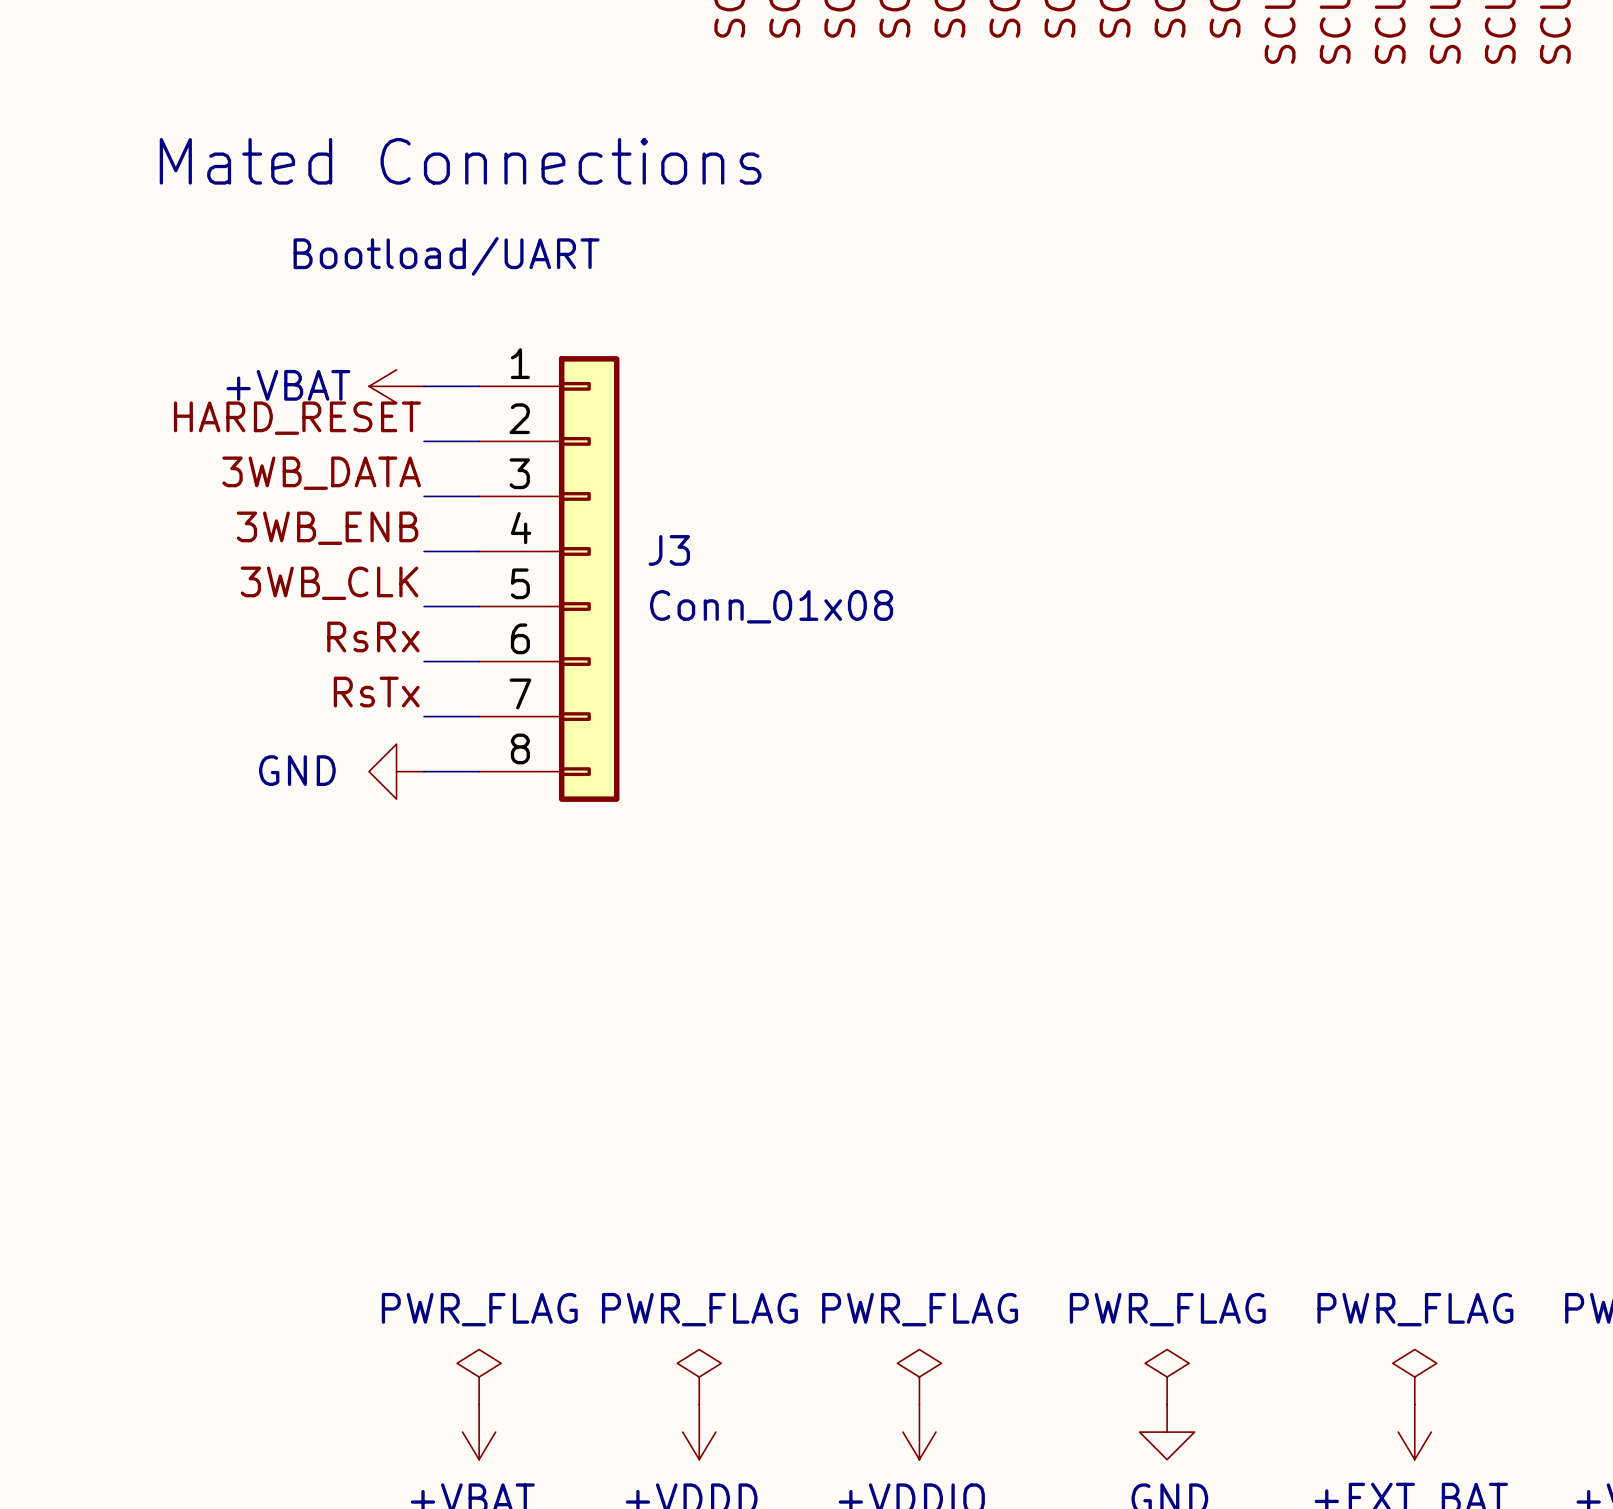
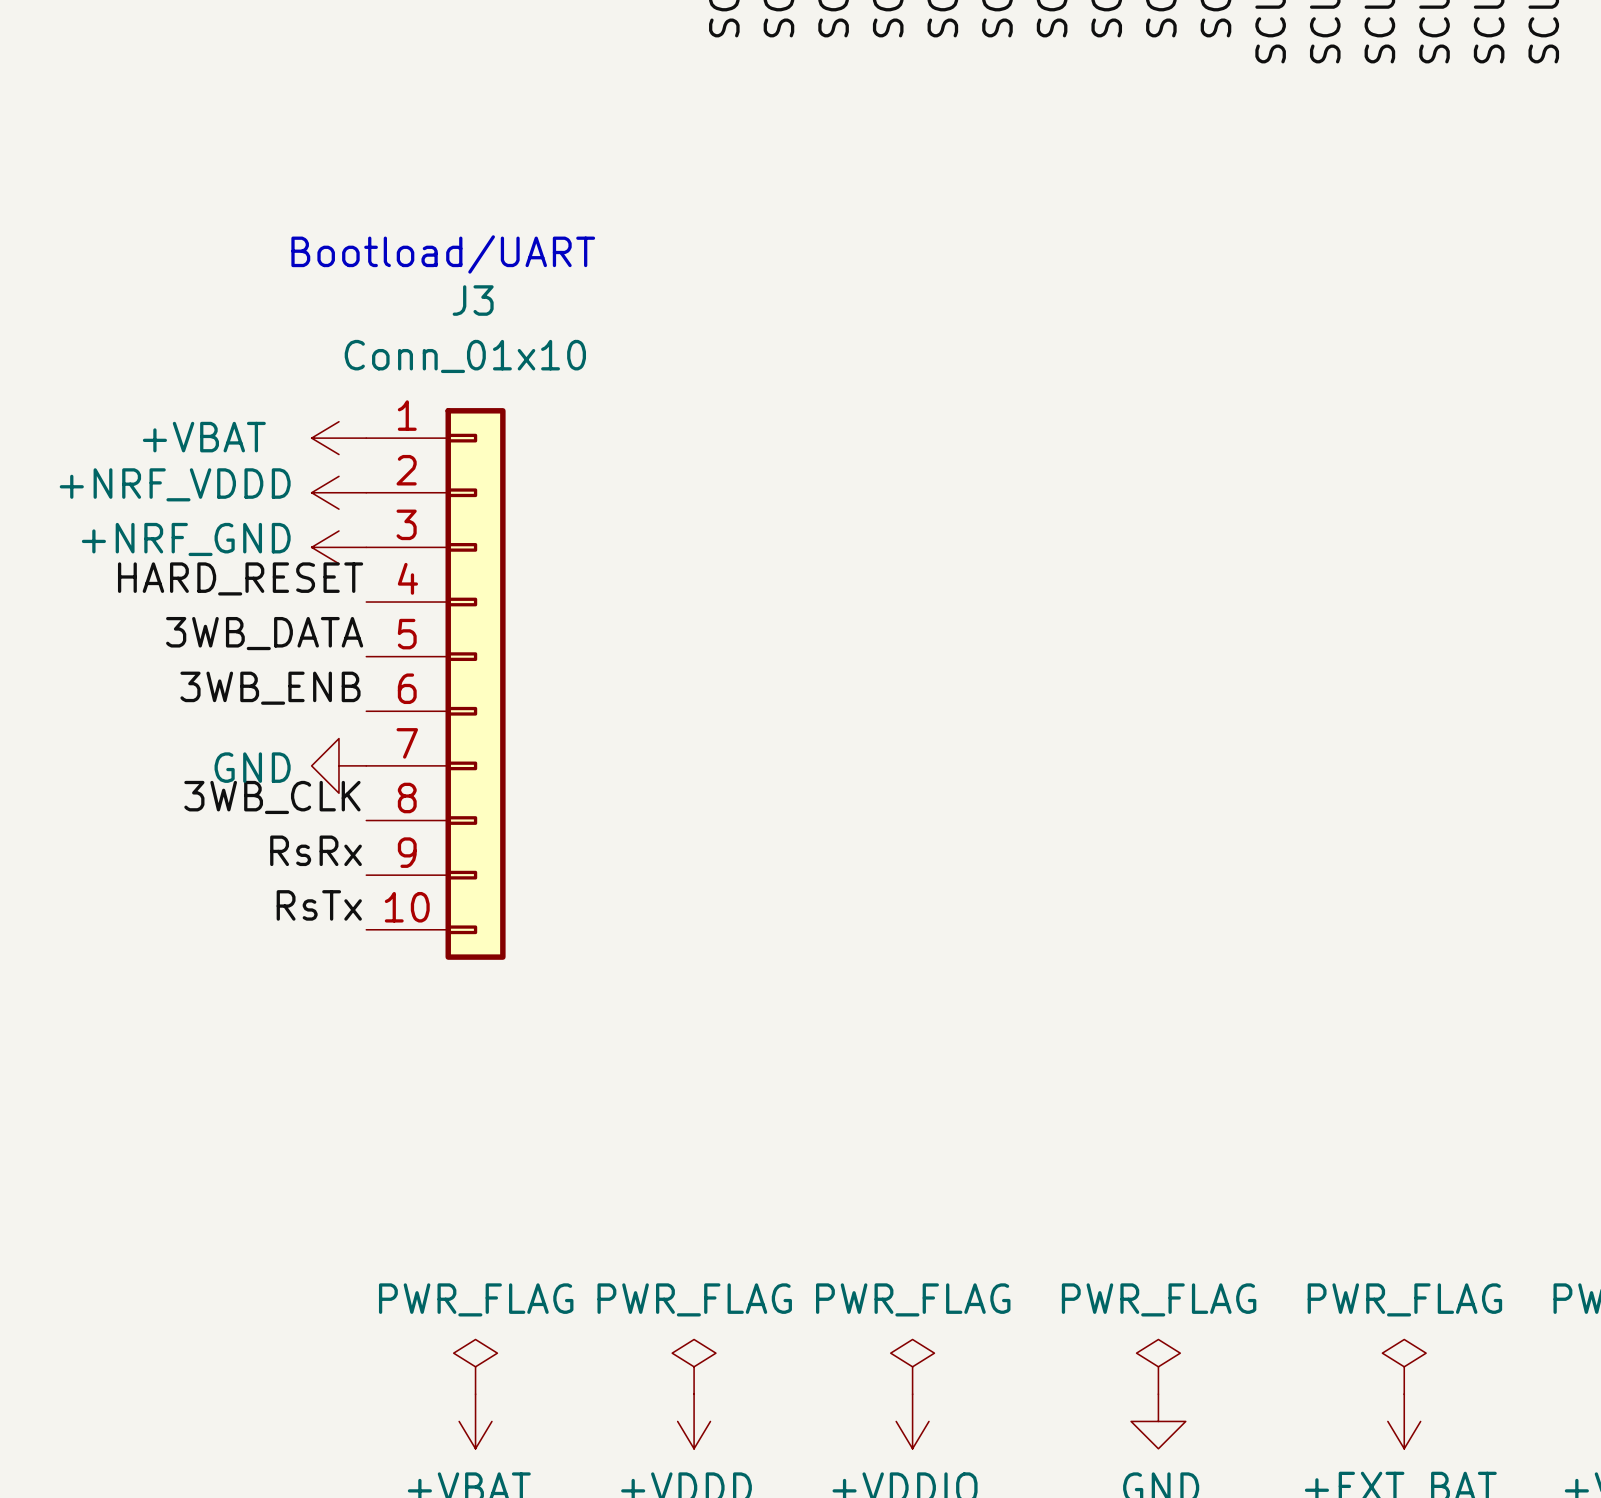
text: Mated Connections (460, 161) -> none
J3 symbol: [479, 356, 620, 802] -> [366, 408, 506, 960]
power symbol text position: +VBAT (288, 385) -> +VBAT (204, 437)
power symbol position: +VBAT (396, 386) -> +VBAT (338, 438)
wire: (424, 386) (479, 386) -> none
label position: HARD_RESET (297, 418) -> HARD_RESET (240, 578)
label position: 3WB_DATA (321, 473) -> 3WB_DATA (264, 633)
power symbol: none -> +NRF_VDDD (338, 492)
label position: 3WB_ENB (327, 528) -> 3WB_ENB (270, 688)
J3 name position: J3 (669, 550) -> J3 (473, 300)
power symbol: none -> +NRF_GND (338, 547)
label position: 3WB_CLK (329, 583) -> 3WB_CLK (272, 797)
J3 value: Conn_01x08 (771, 606) -> Conn_01x10 (465, 356)
label position: RsRx (373, 637) -> RsRx (316, 850)
label position: RsTx (376, 692) -> RsTx (319, 905)
power symbol text position: GND (297, 770) -> GND (252, 767)
power symbol position: GND (396, 771) -> GND (338, 765)

